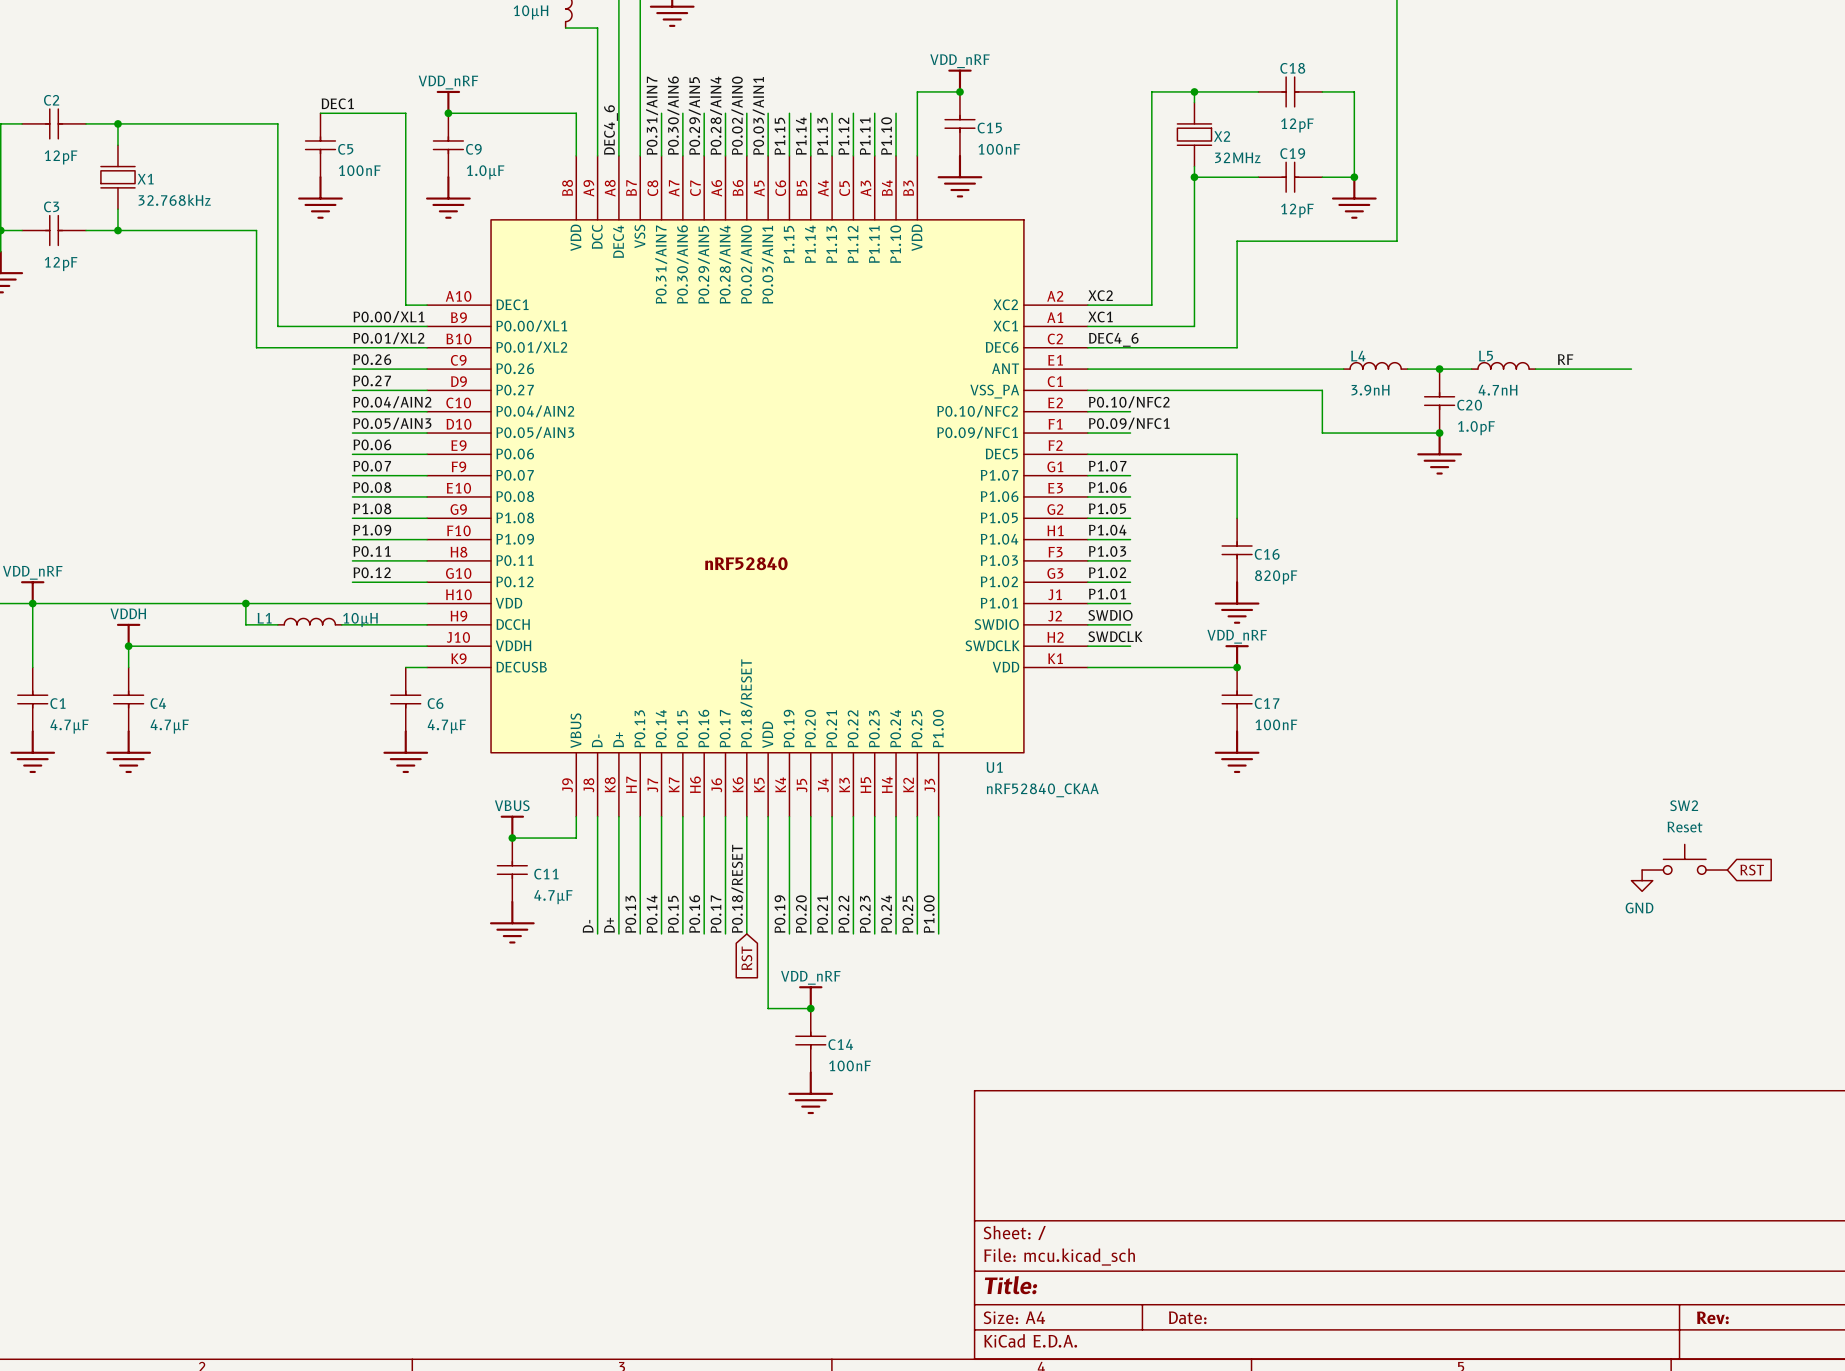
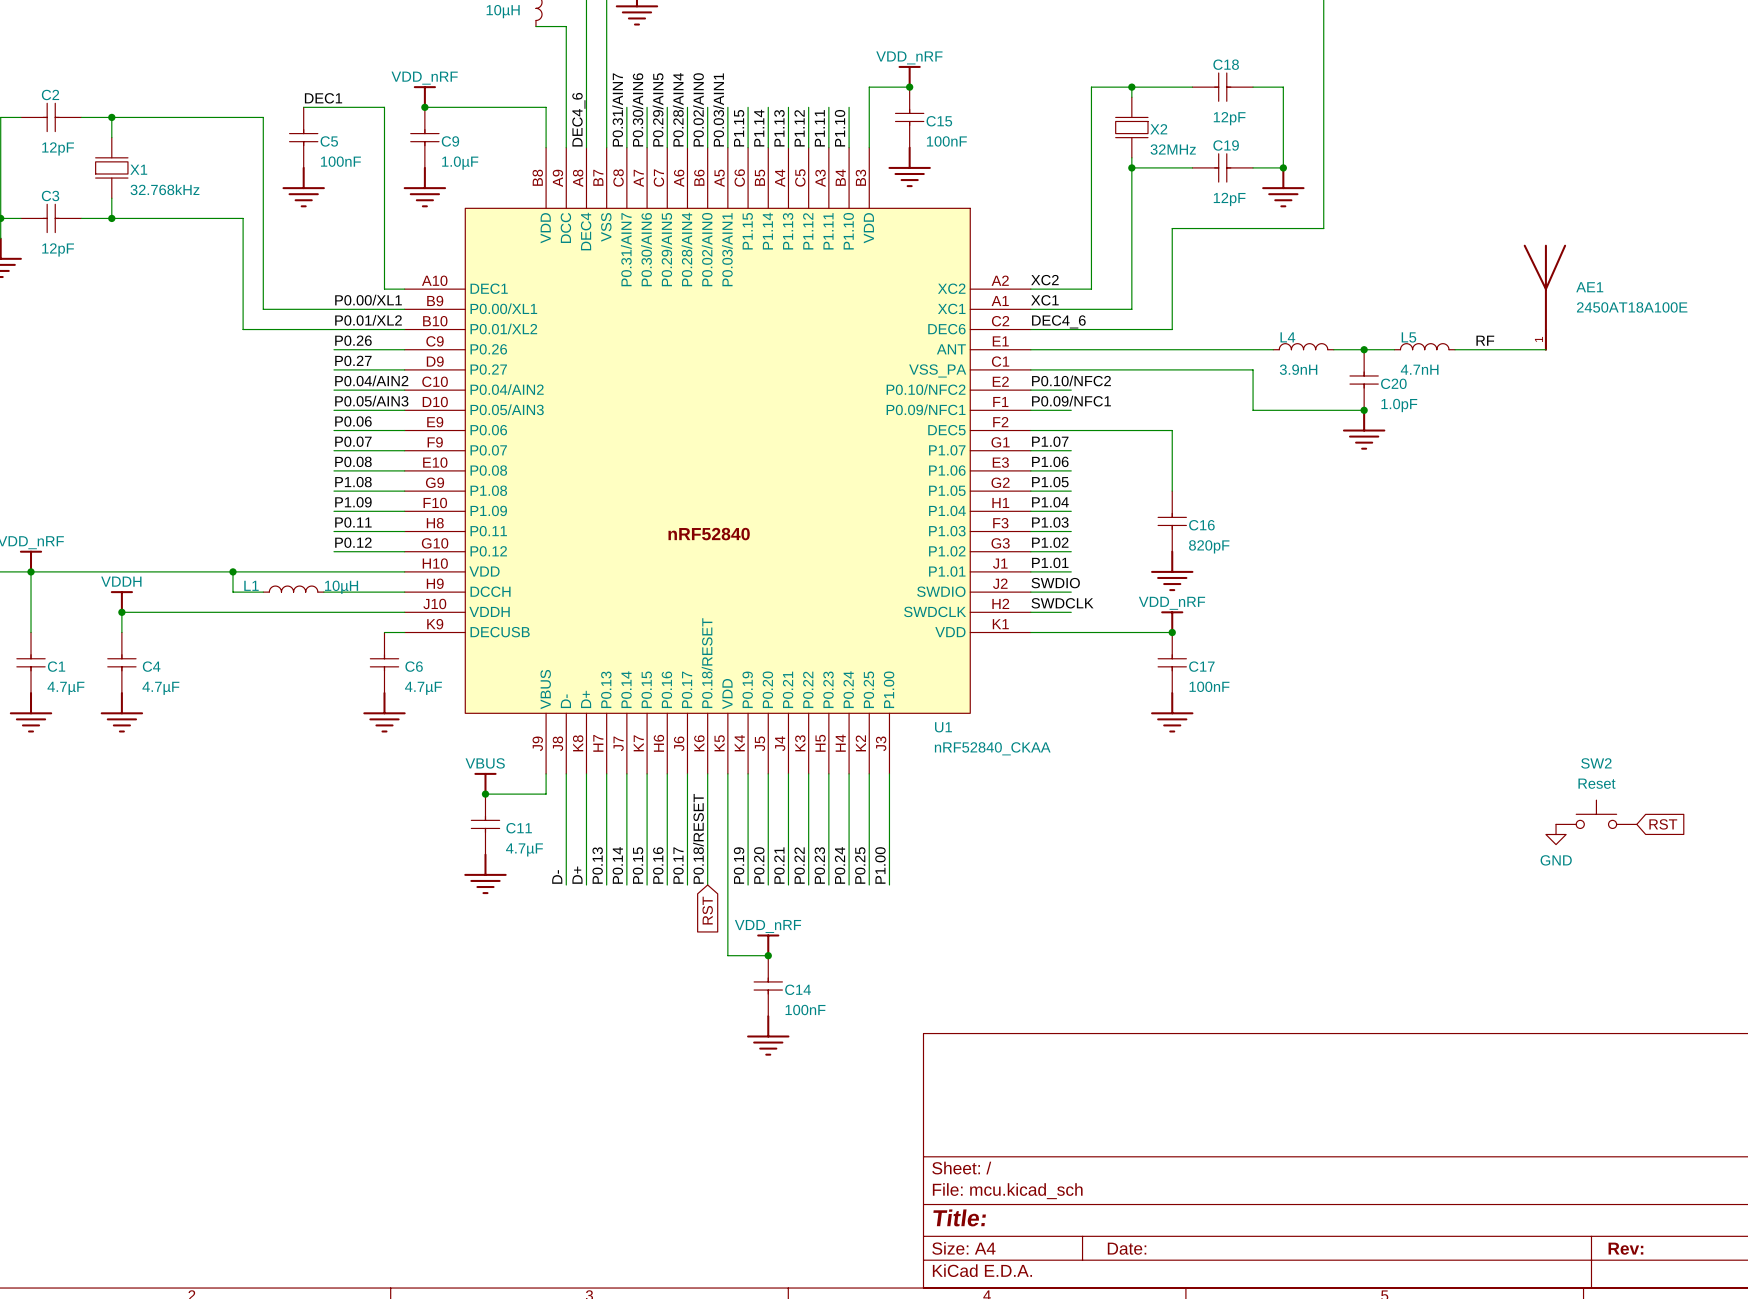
AE1: none -> 2450AT18A100E (1544, 297)

